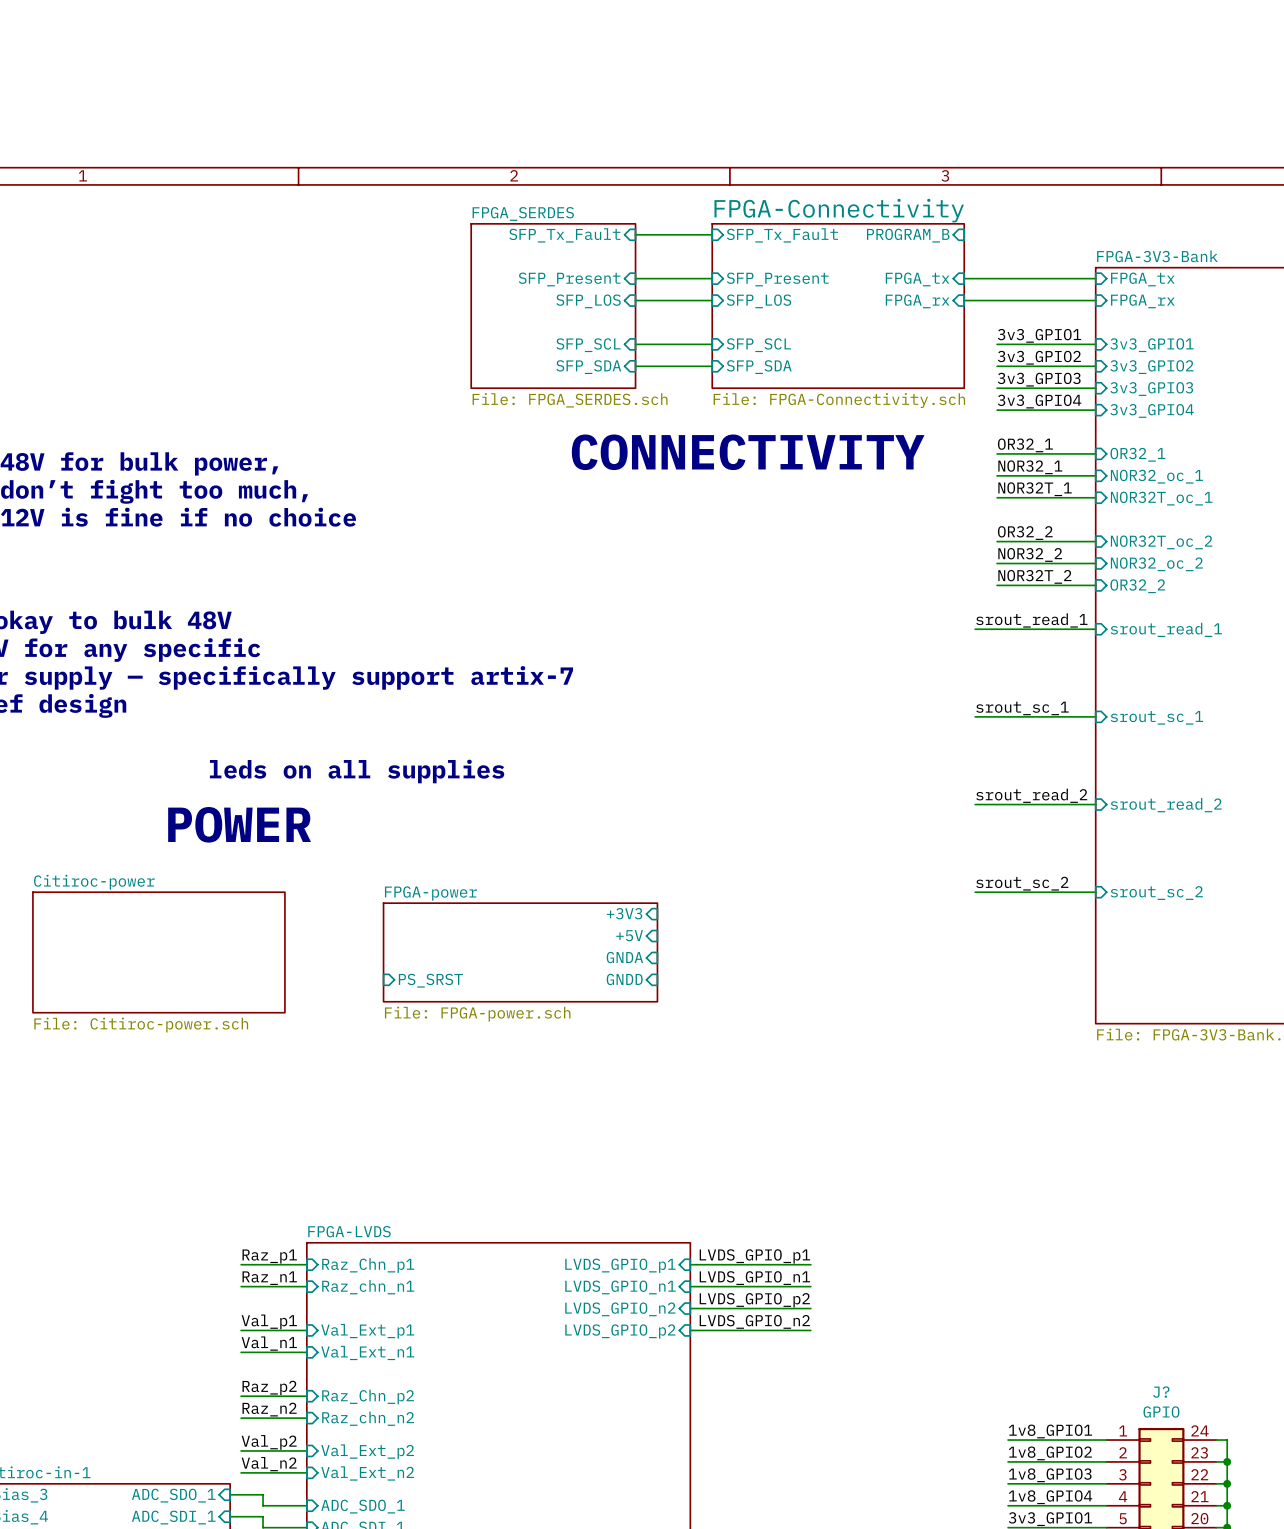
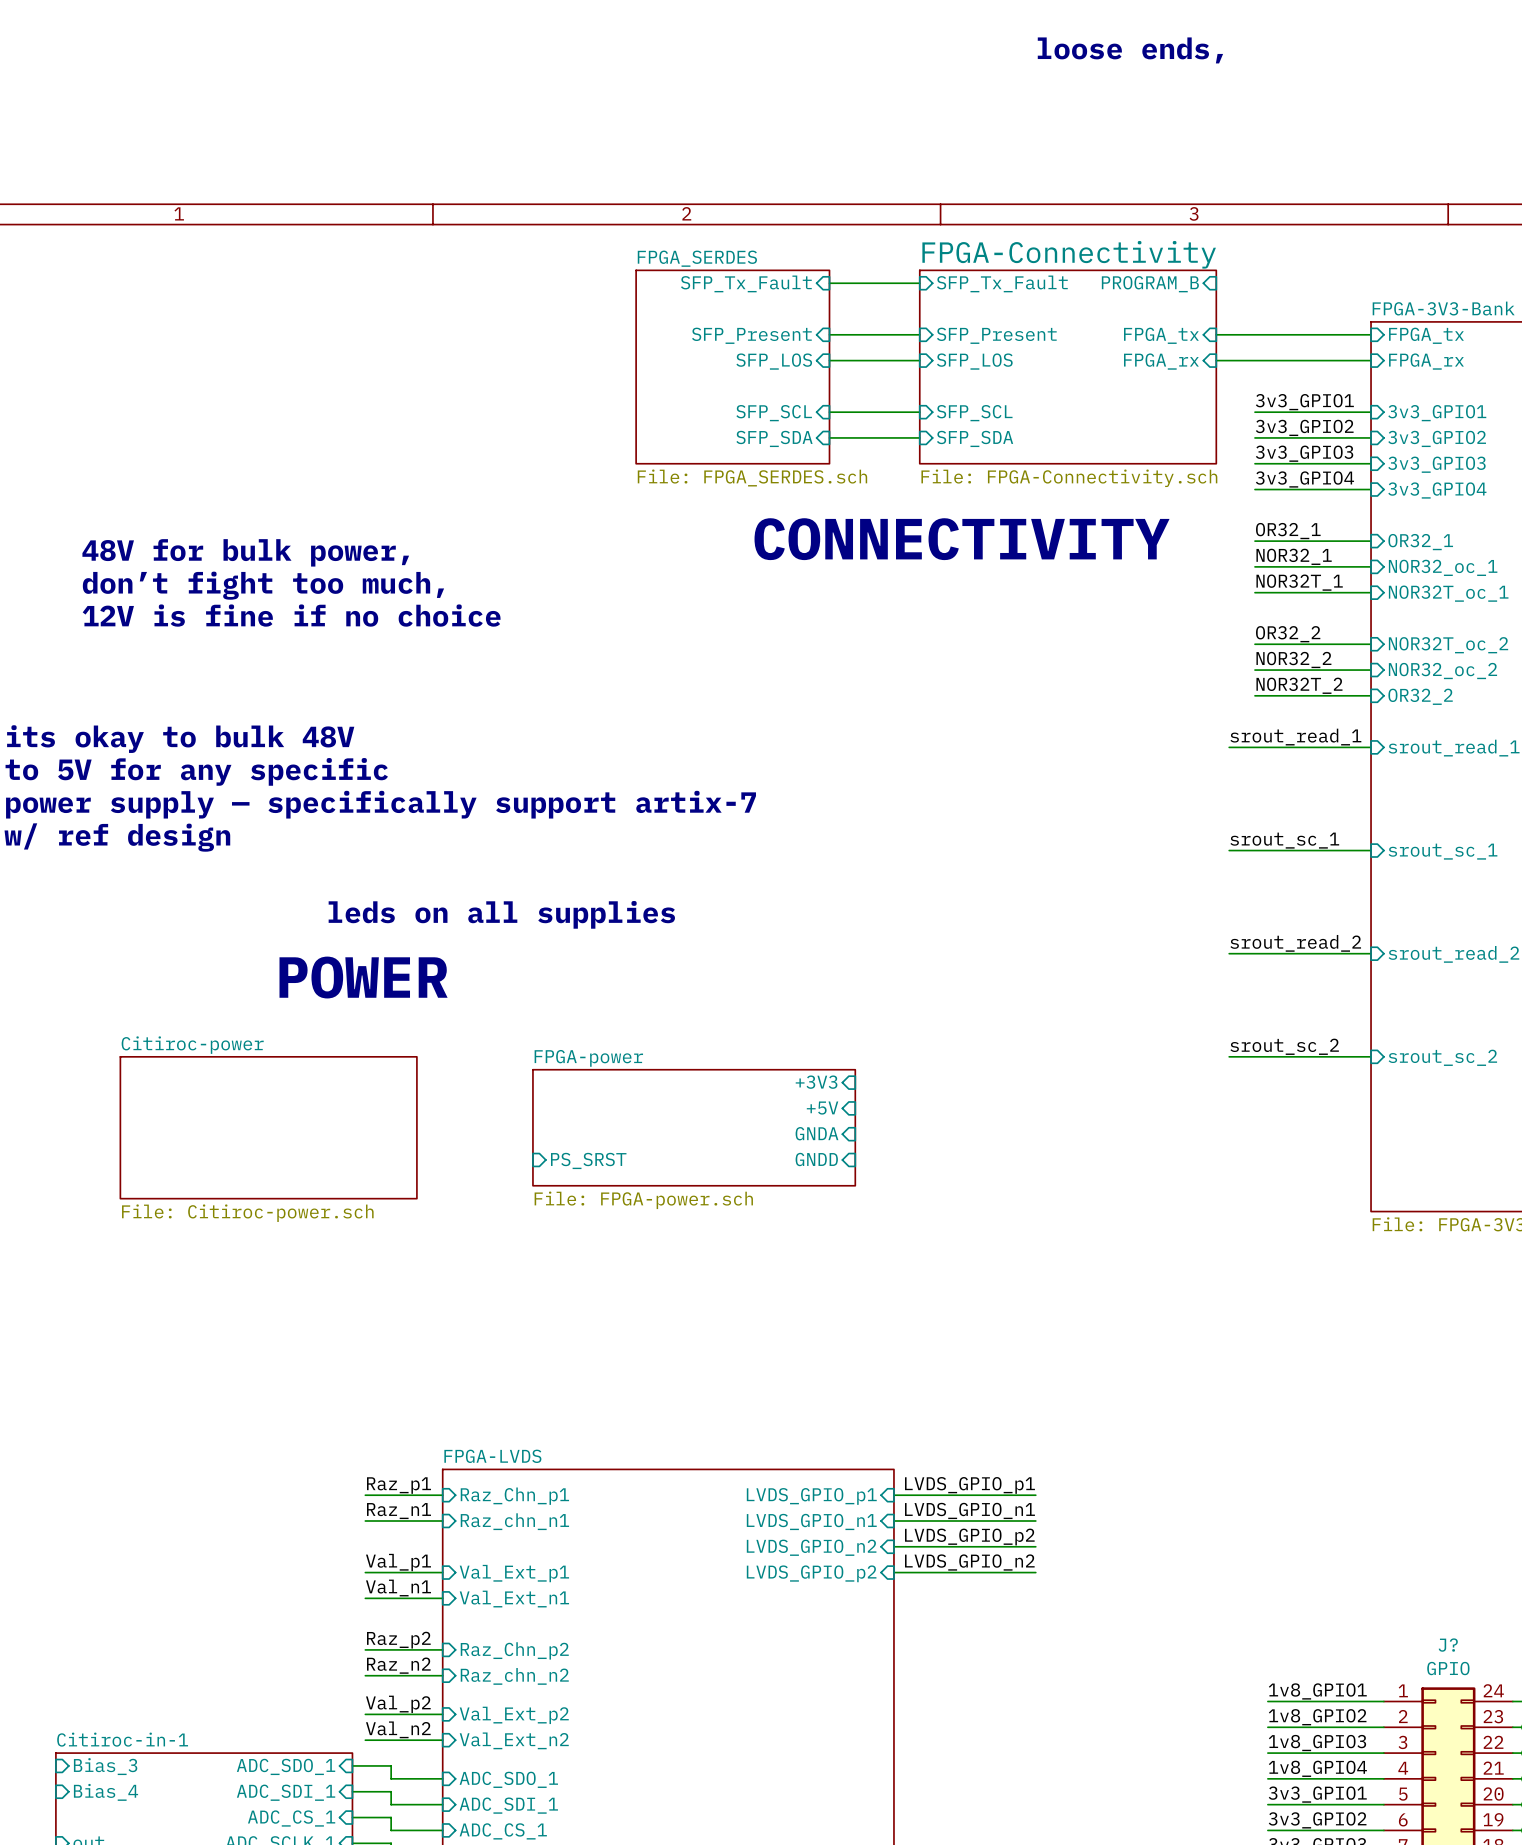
text: none -> loose ends, (1130, 50)

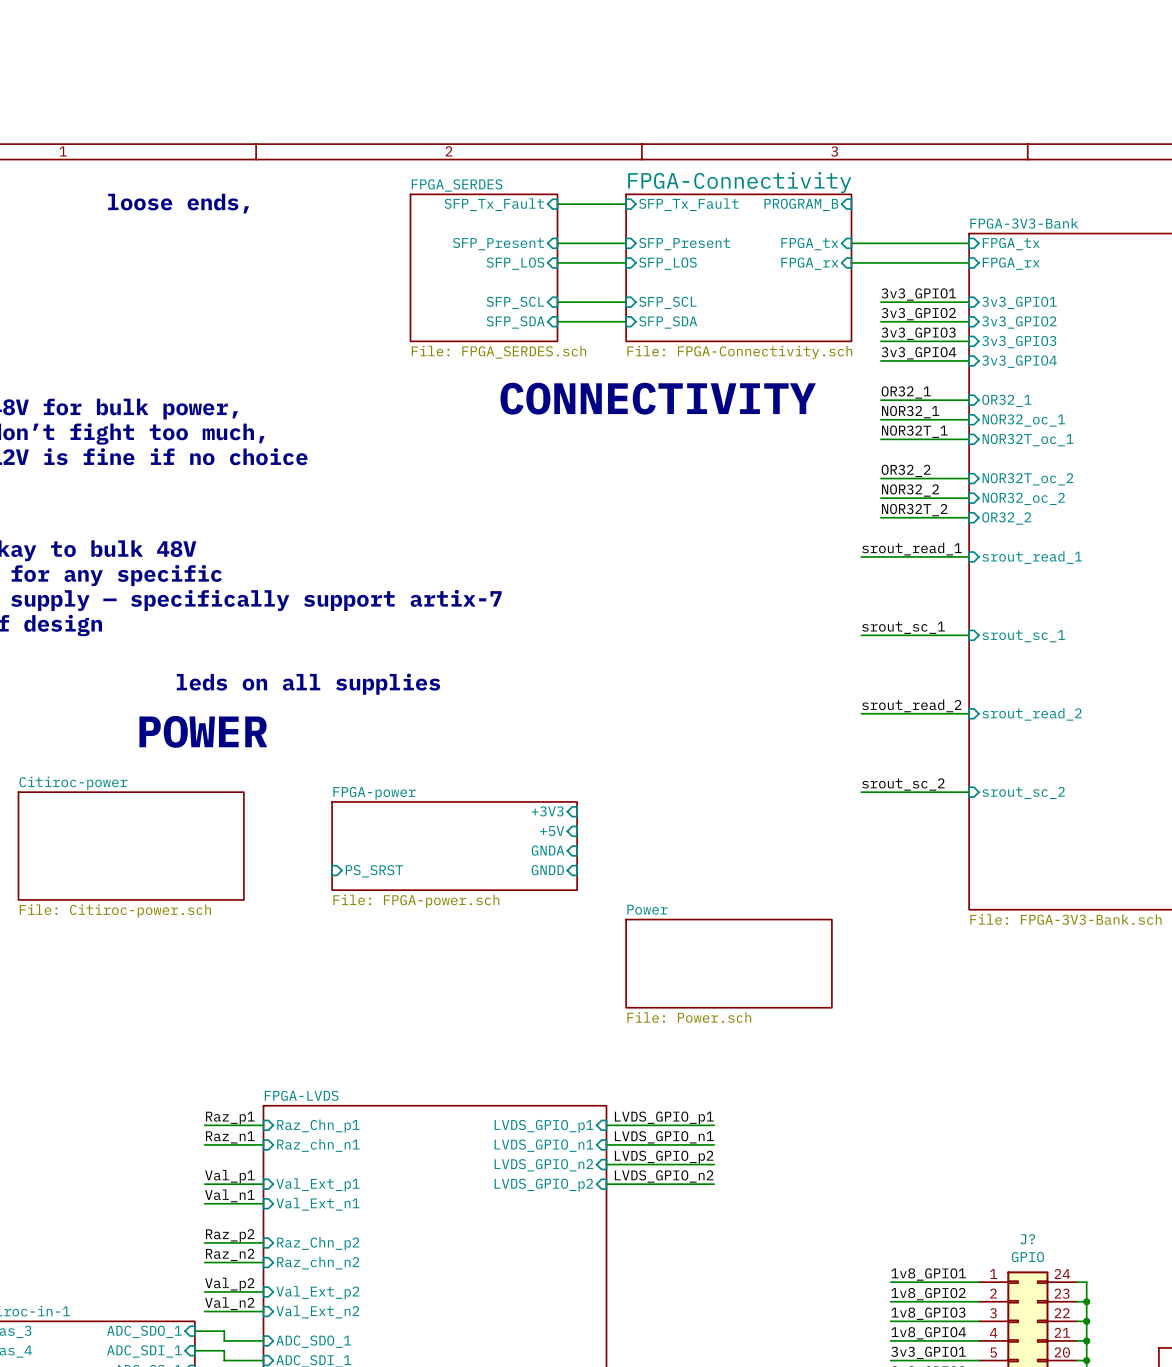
text: loose ends, (1130, 50) -> none
text: none -> loose ends, (178, 203)
sheet Power: none -> File: Power.sch (729, 963)

